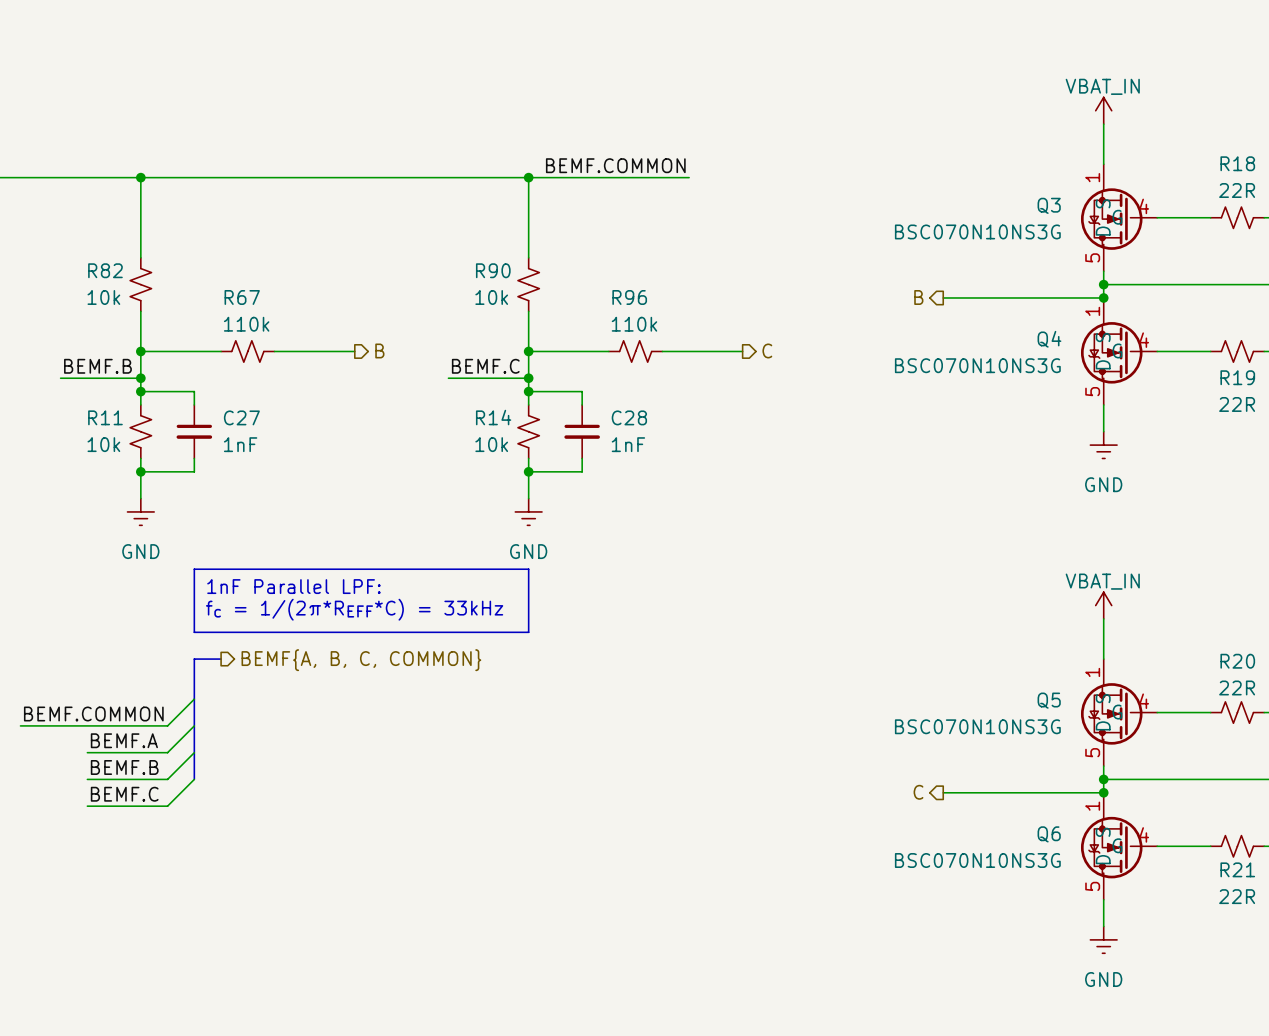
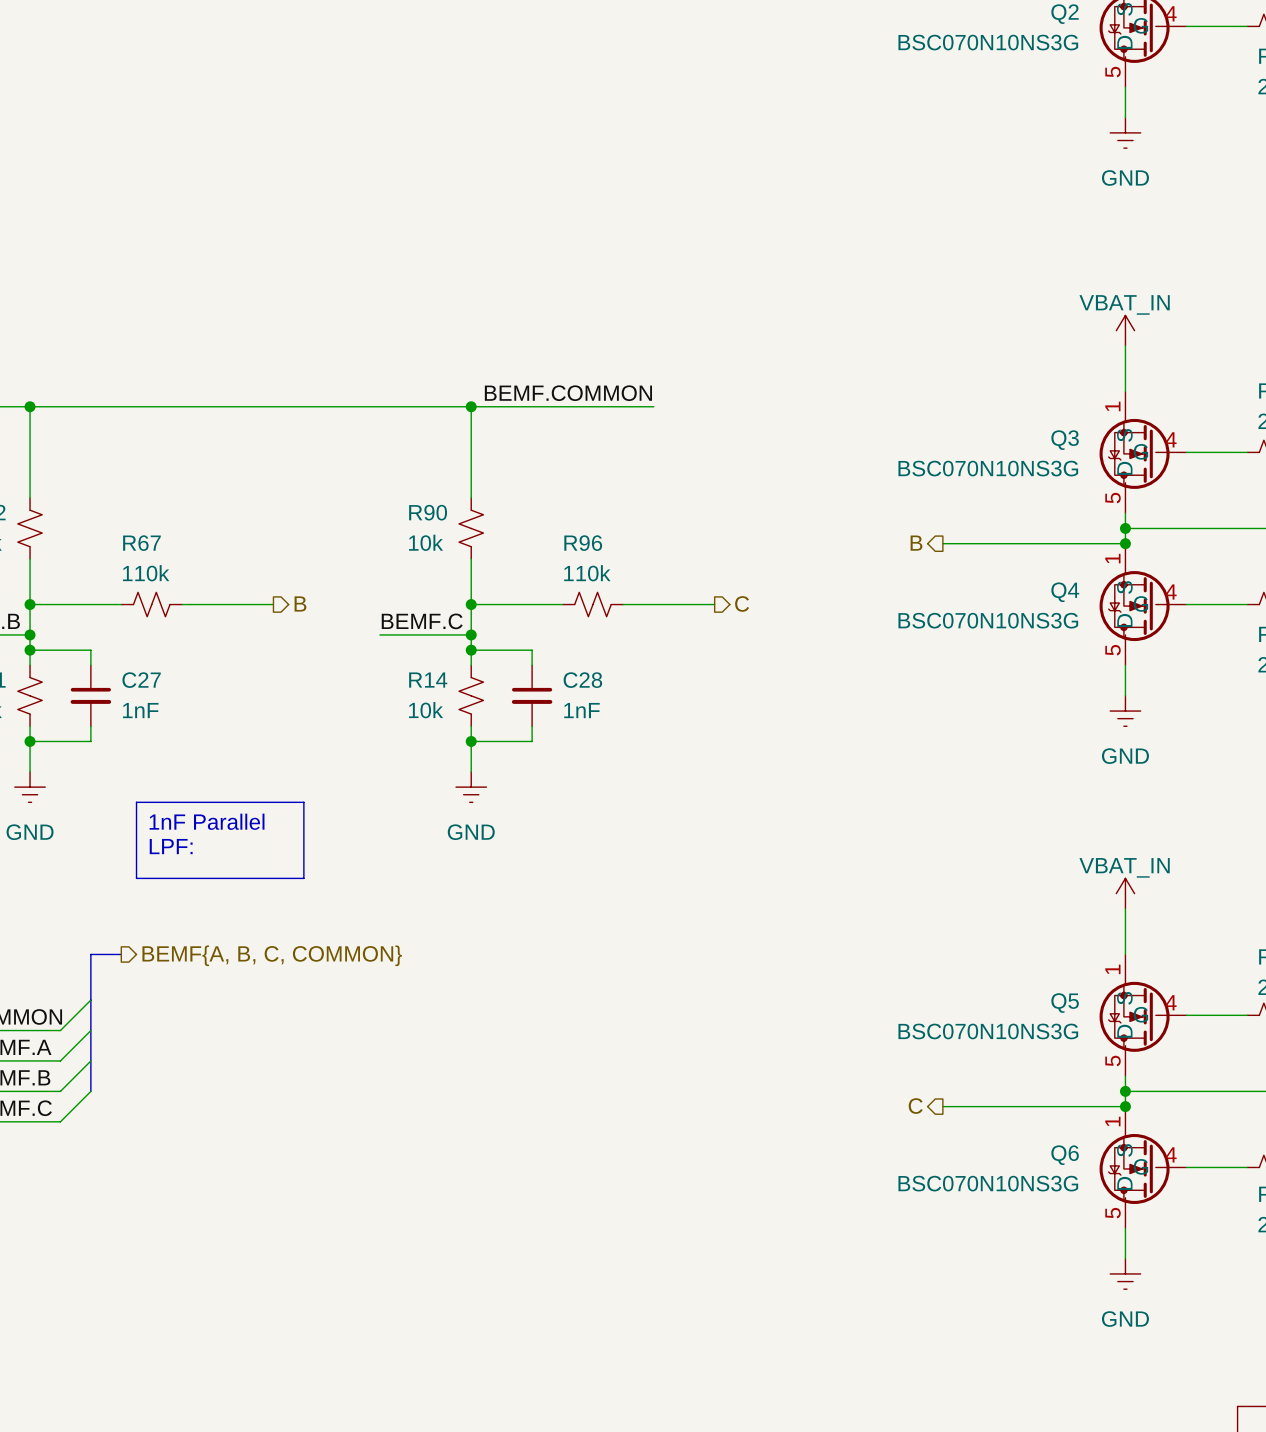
line: none -> (136, 802) (303, 802) (303, 878) (136, 878) (136, 802)
text: none -> 1nF Parallel (207, 821)
text: none -> LPF: (171, 846)
line: (194, 569) (528, 569) (528, 632) (194, 632) (194, 569) -> none
text: 1nF Parallel LPF: (293, 586) -> none
text: fc = 1/(2π*REFF*C) = 33kHz (354, 609) -> none

